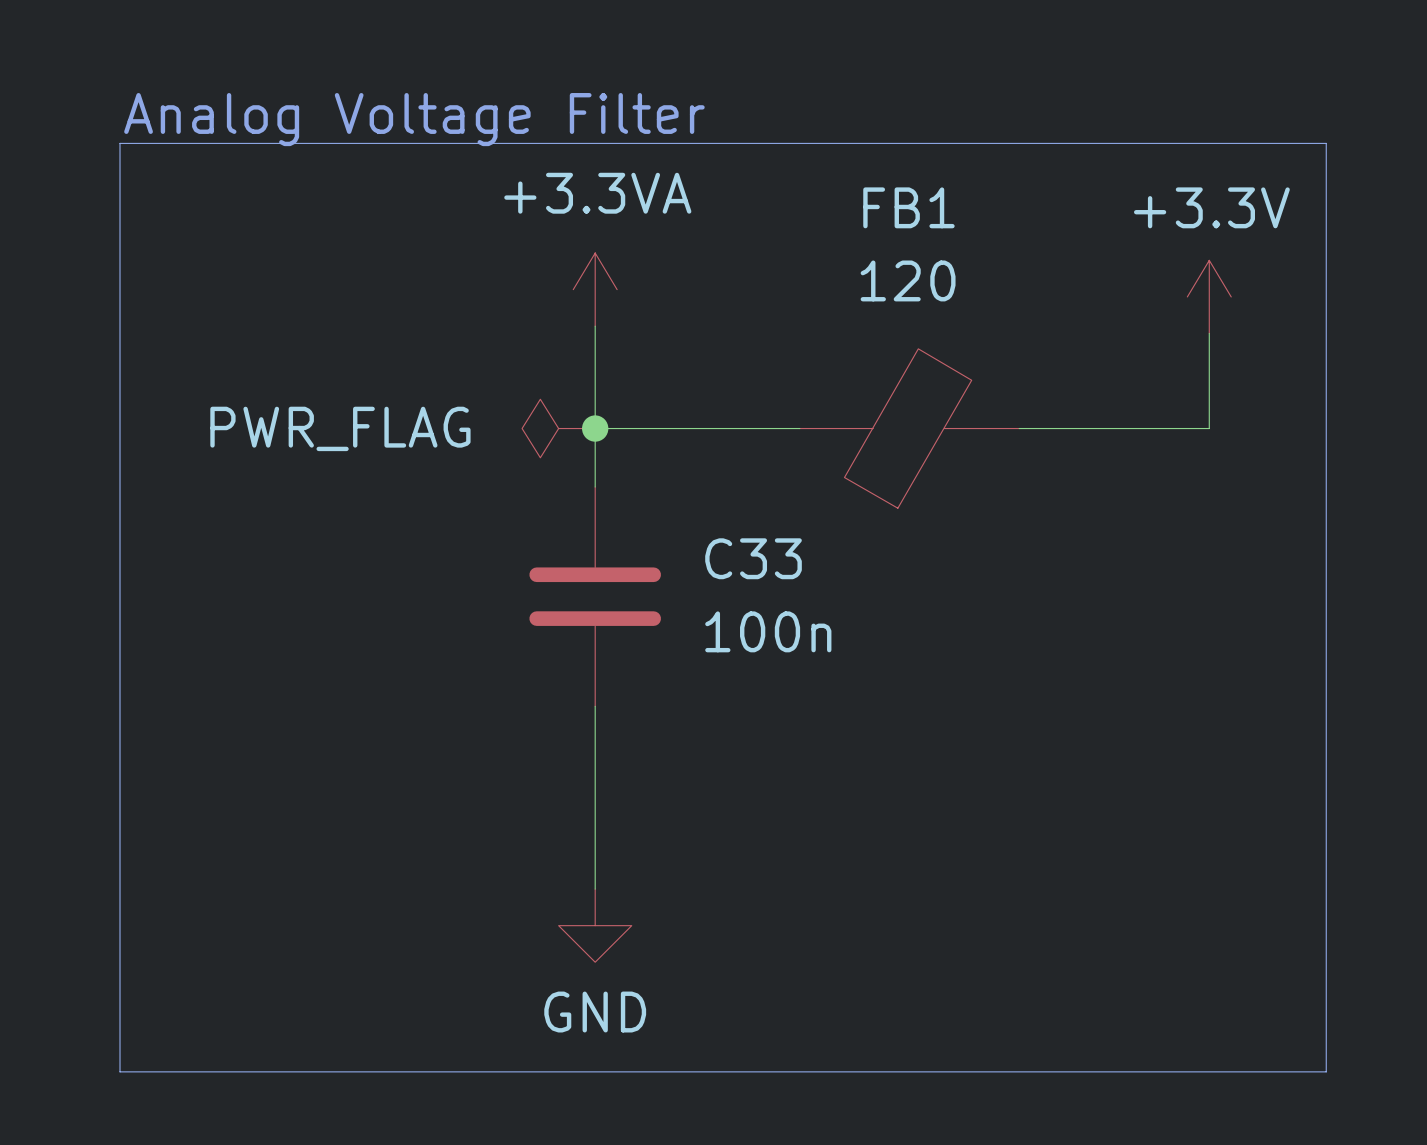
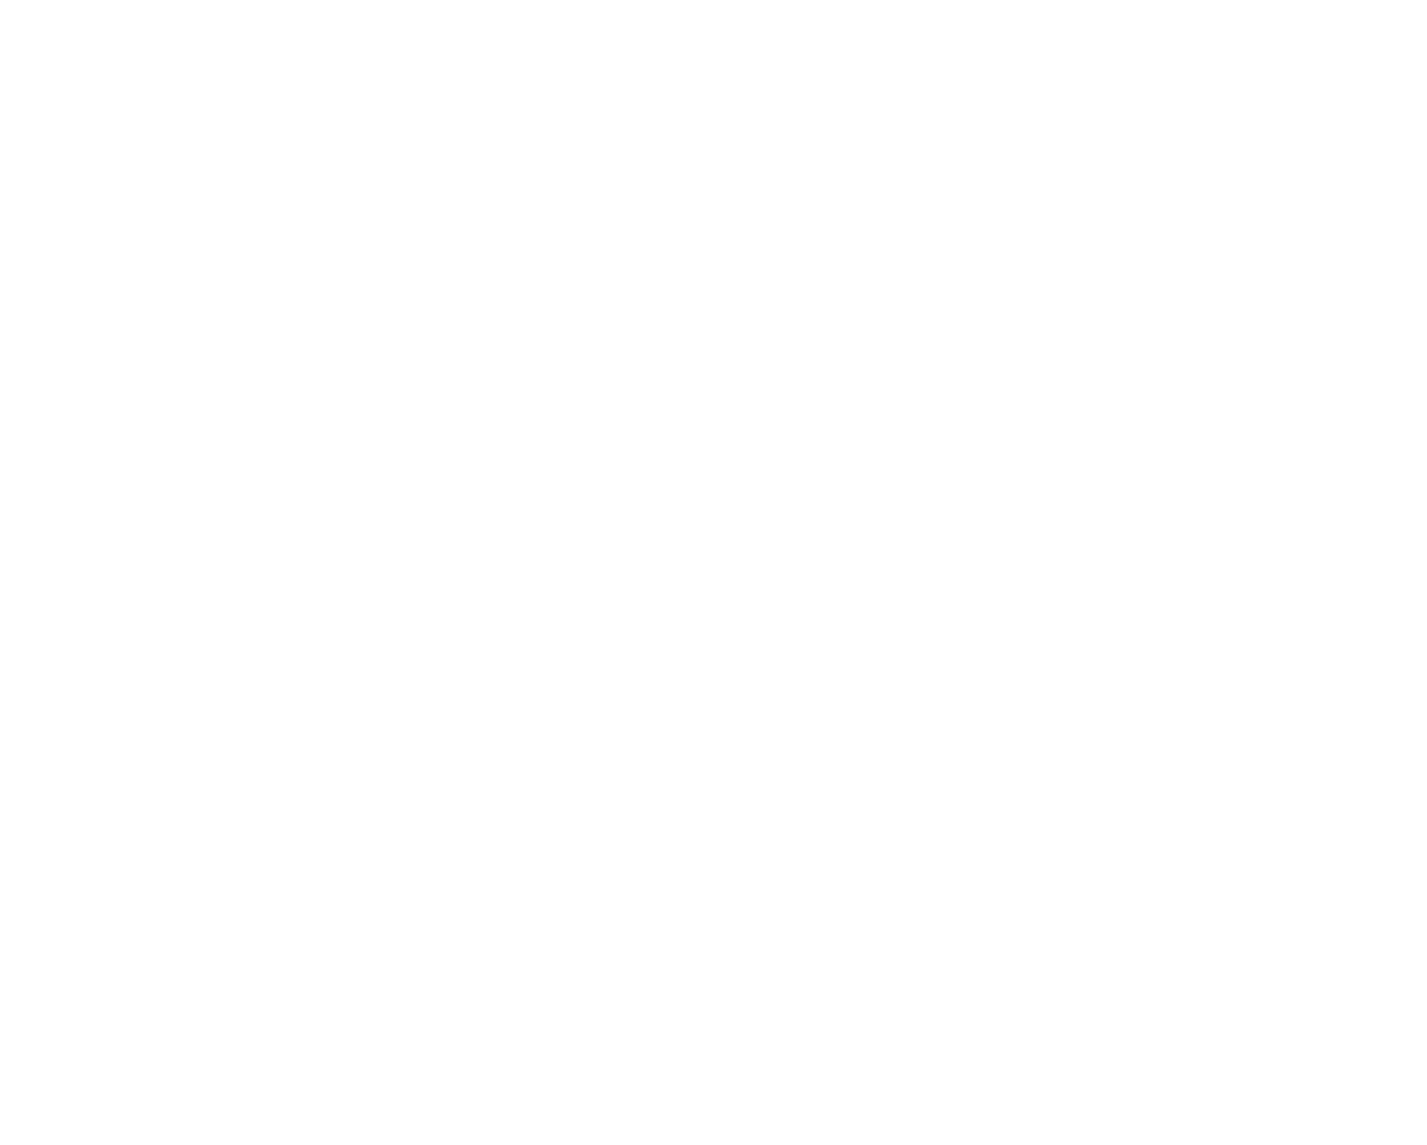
text: Analog Voltage Filter (414, 119) -> none
line: (120, 143) (1326, 143) (1326, 1071) (120, 1071) (120, 143) -> none
power symbol: +3.3VA (595, 289) -> none
power symbol: +3.3V (1209, 296) -> none
wire: (595, 326) (595, 487) -> none
wire: (1209, 333) (1209, 428) (1019, 428) -> none
power symbol: PWR_FLAG (558, 428) -> none
wire: (595, 428) (799, 428) -> none
junction: (595, 428) -> none
FB1: 120 (909, 428) -> none
C33: 100n (595, 596) -> none
wire: (595, 706) (595, 889) -> none
power symbol: GND (595, 925) -> none

